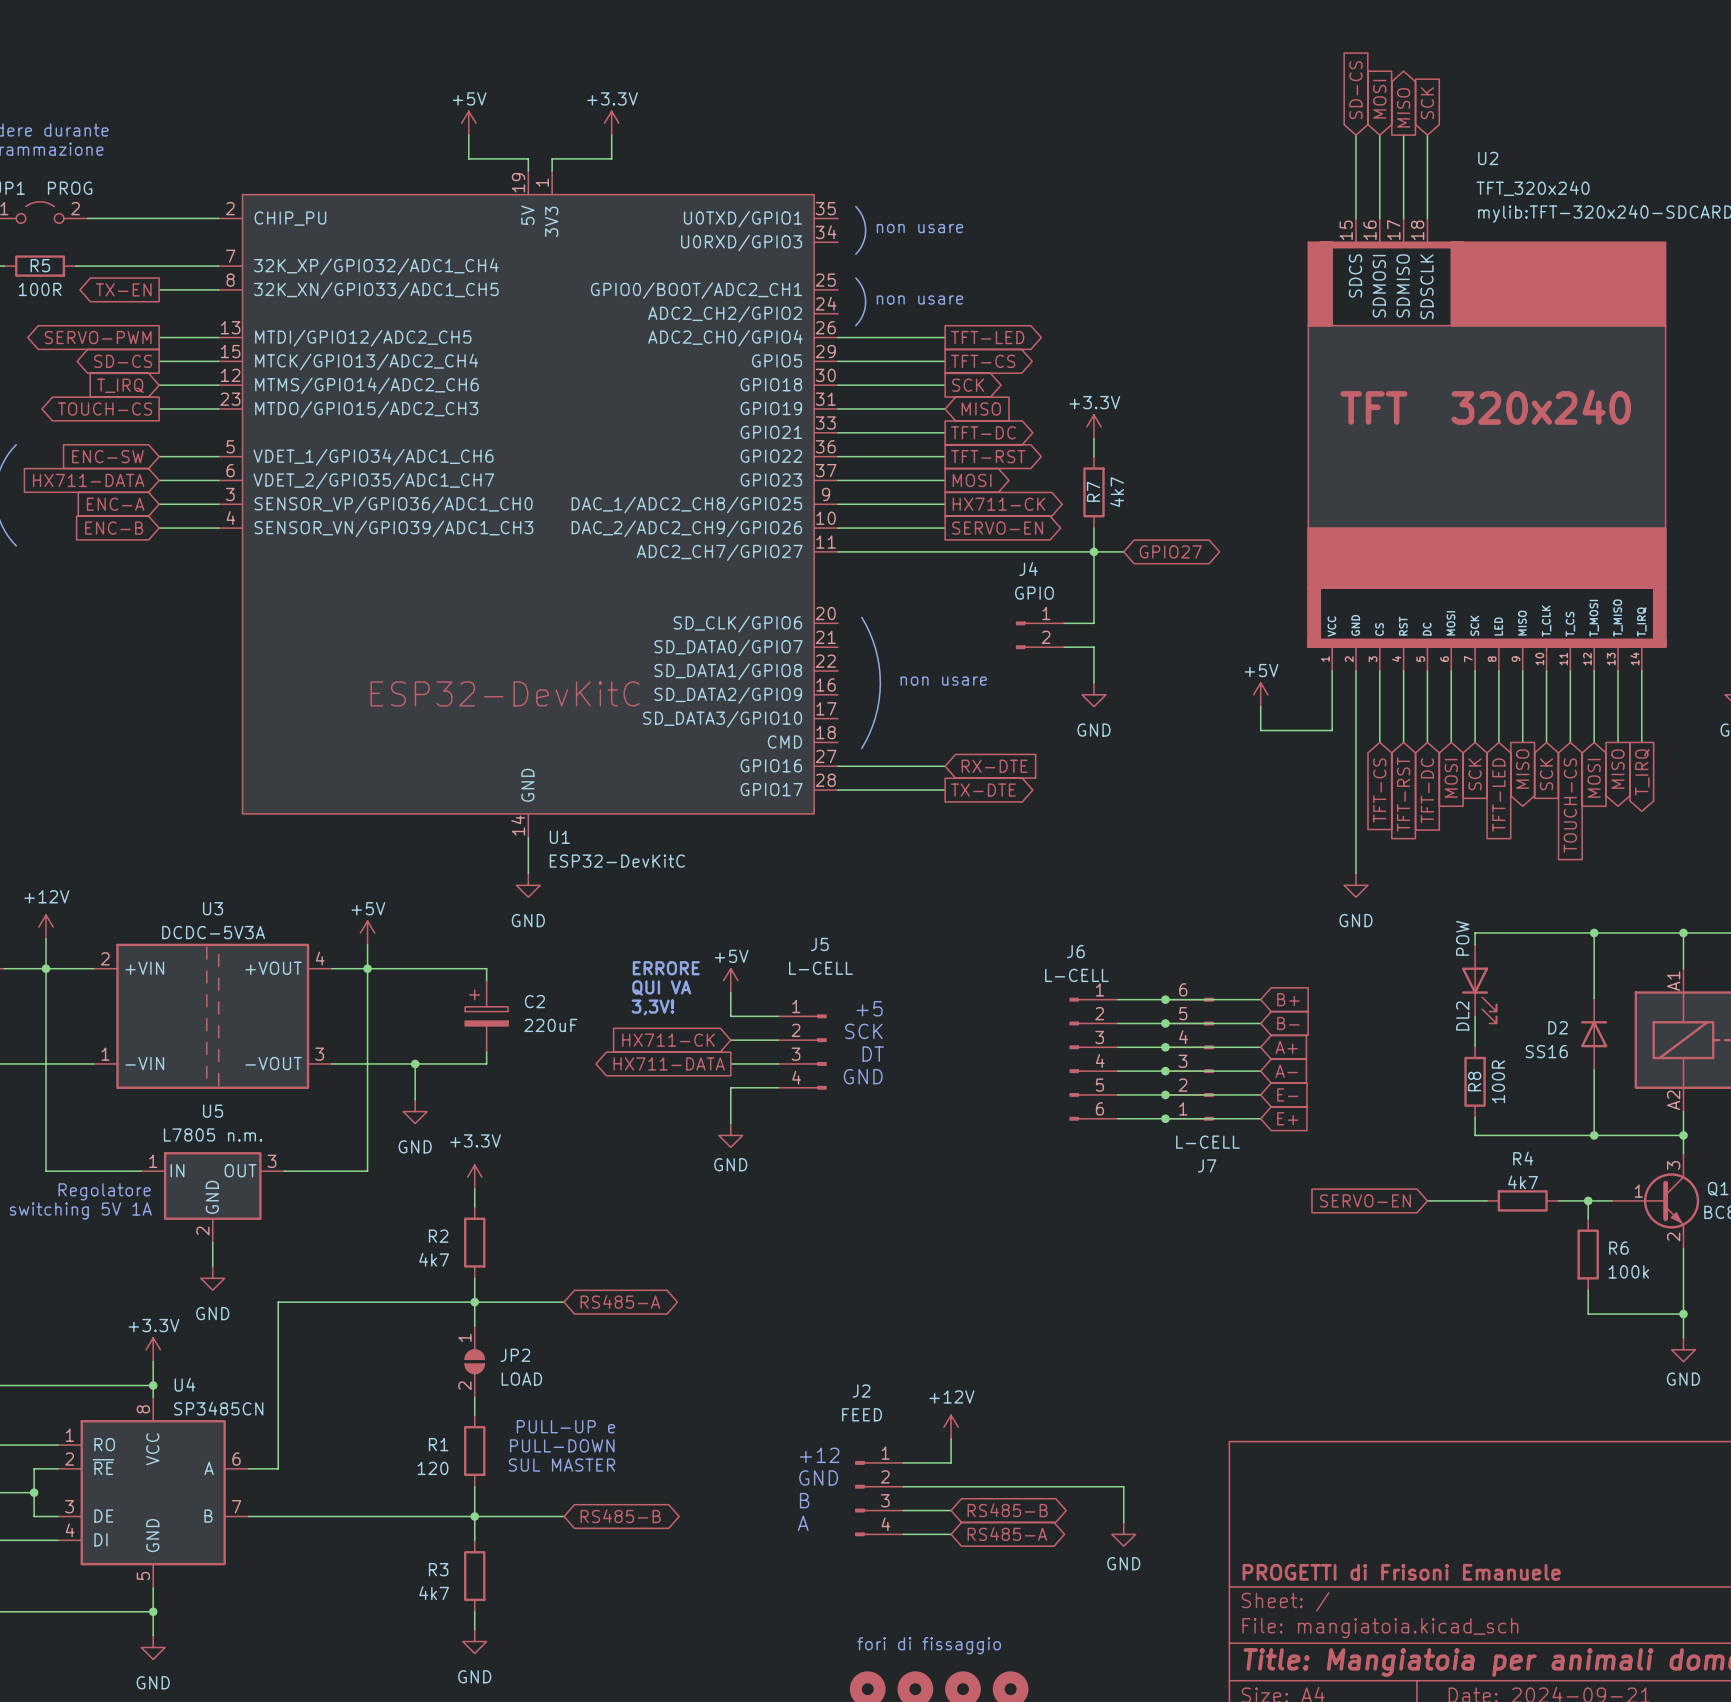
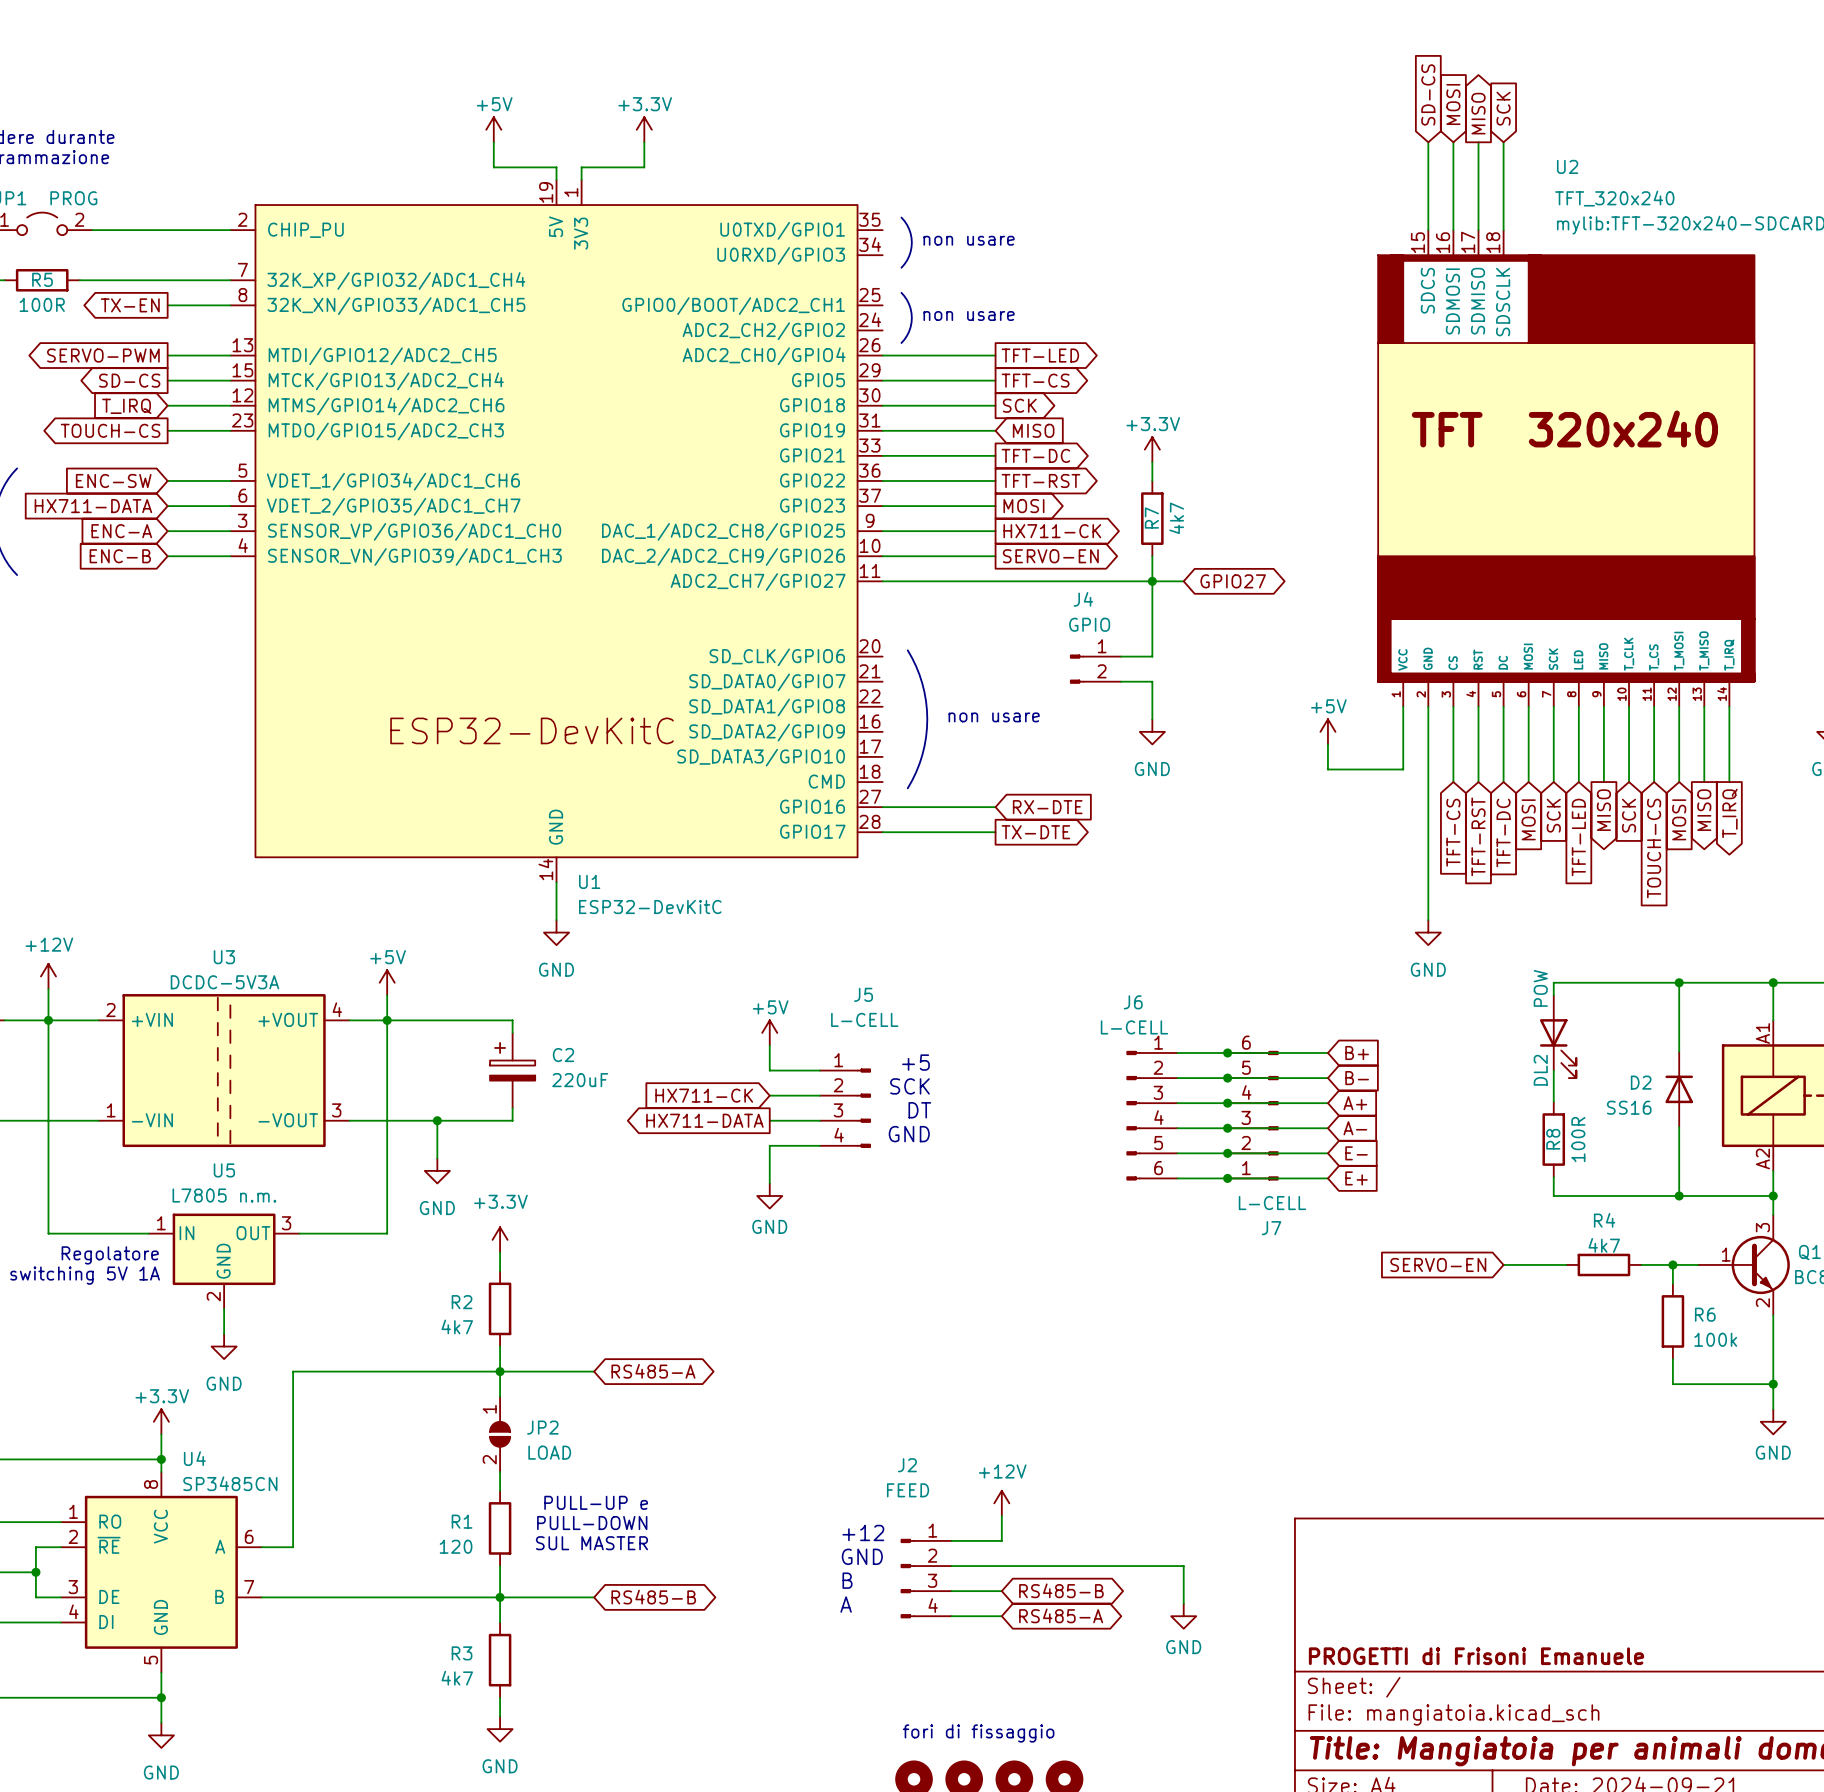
text: ERRORE (666, 968) -> none
text: QUI VA (661, 987) -> none
text: 3,3V! (652, 1007) -> none

